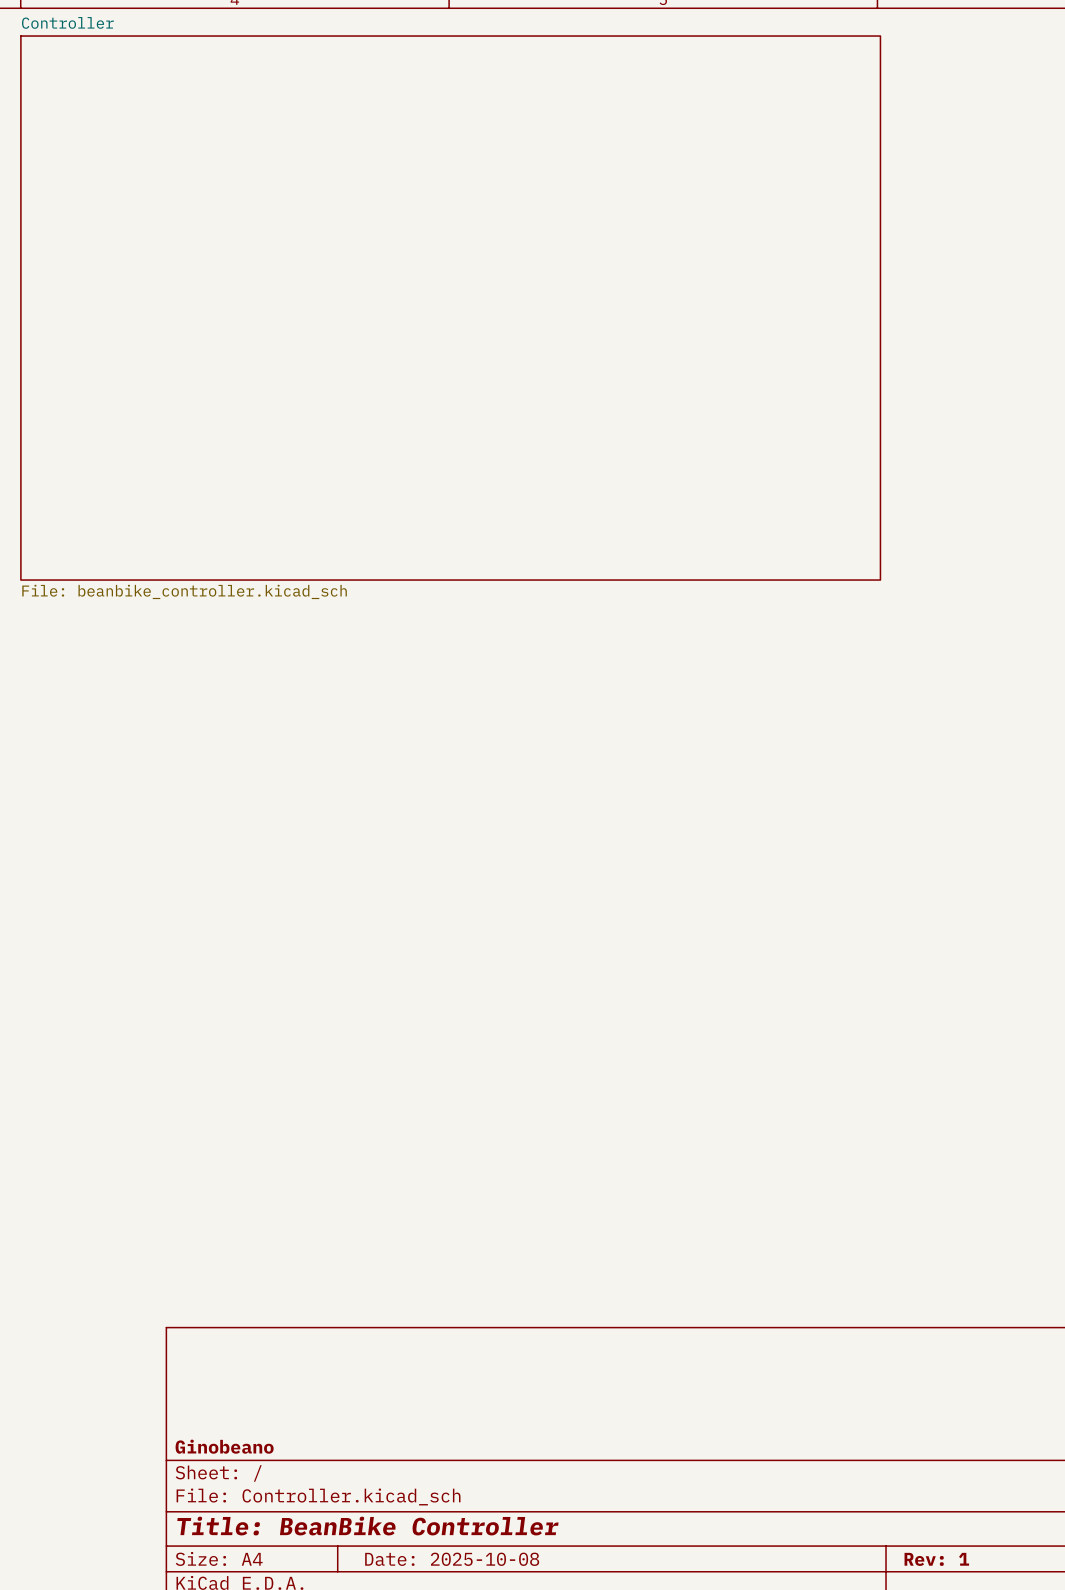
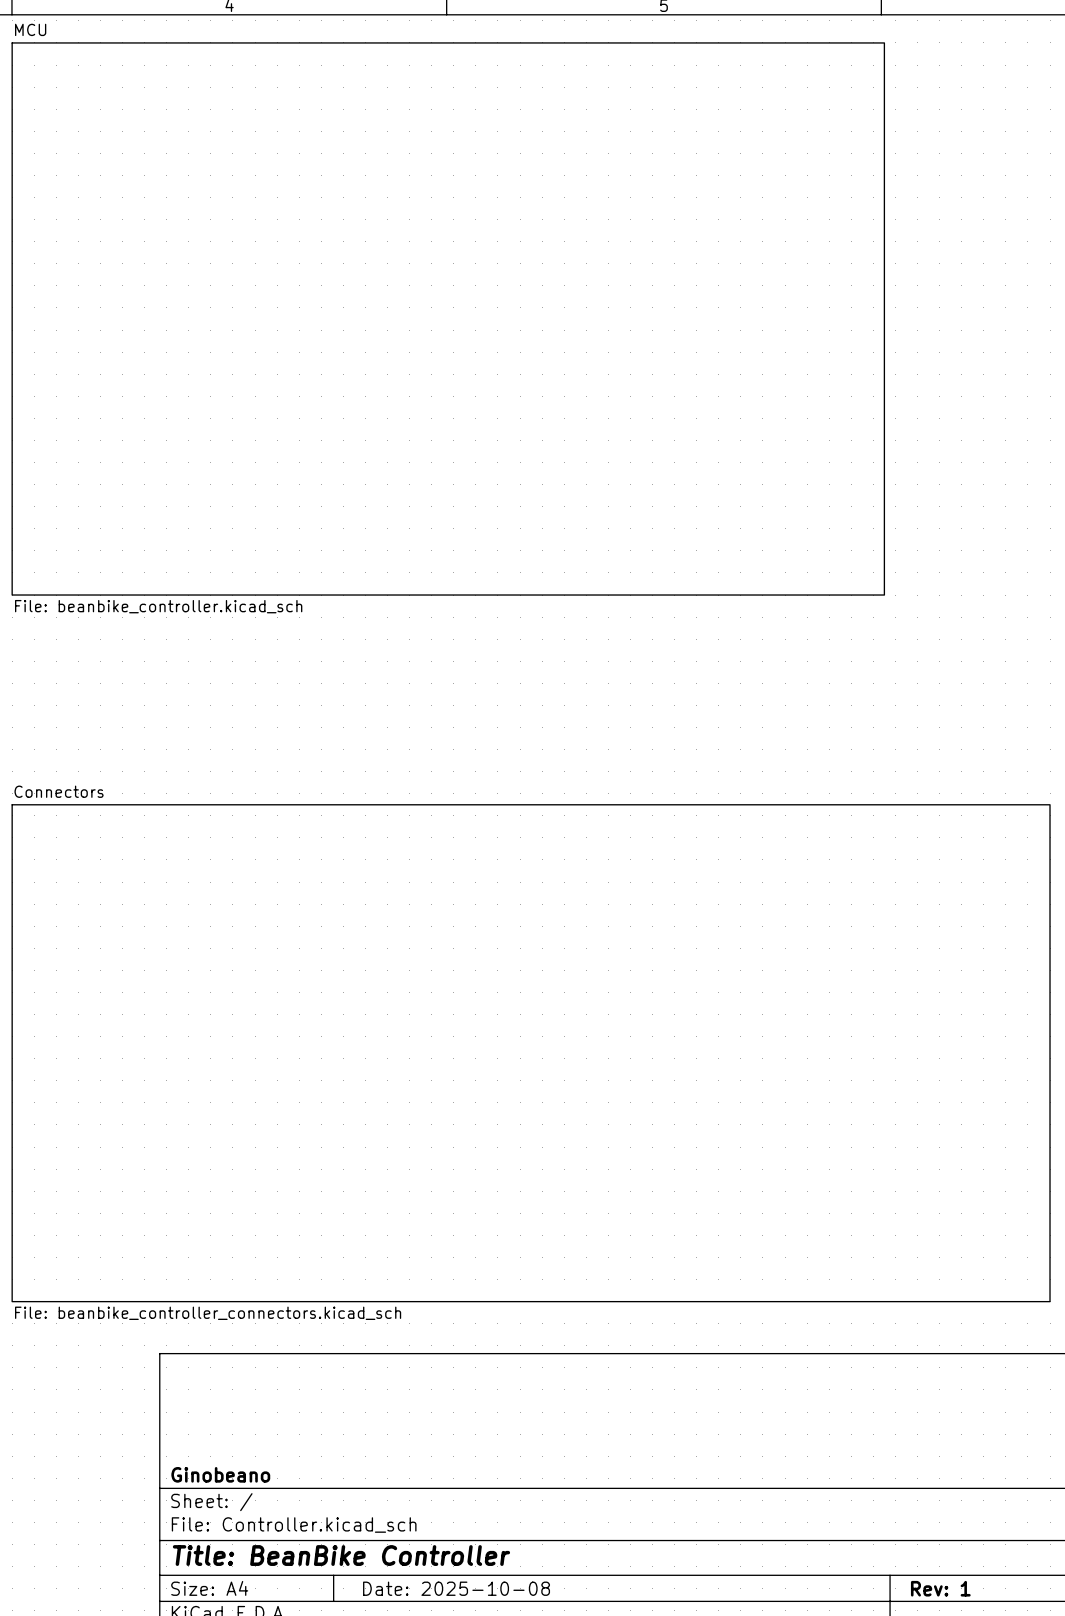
sheet Controller name: Controller (67, 22) -> MCU (30, 29)
sheet Connectors: none -> File: beanbike_controller_connectors.kicad_sch (531, 1053)

